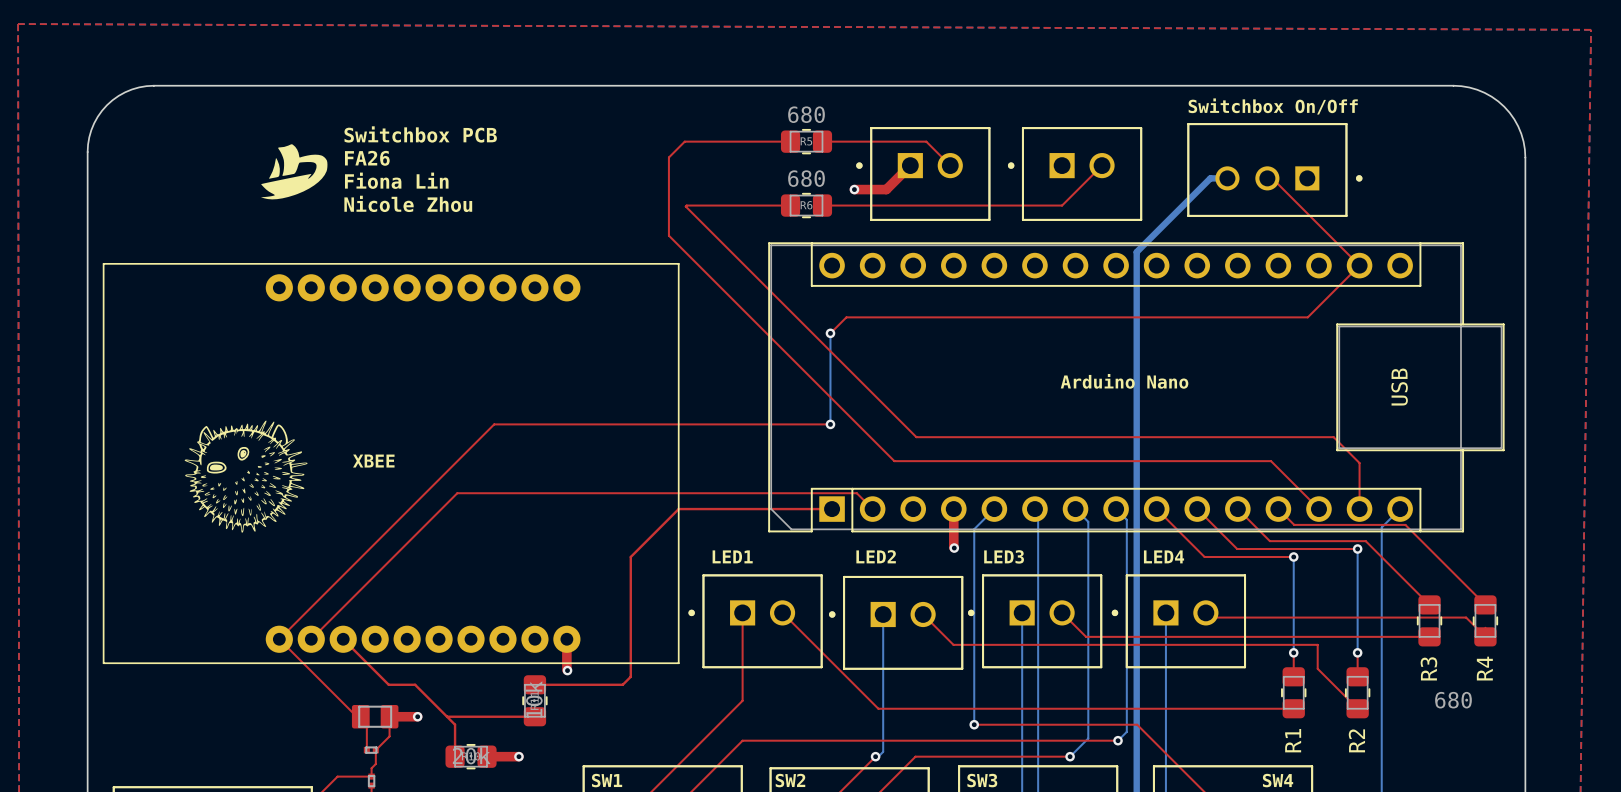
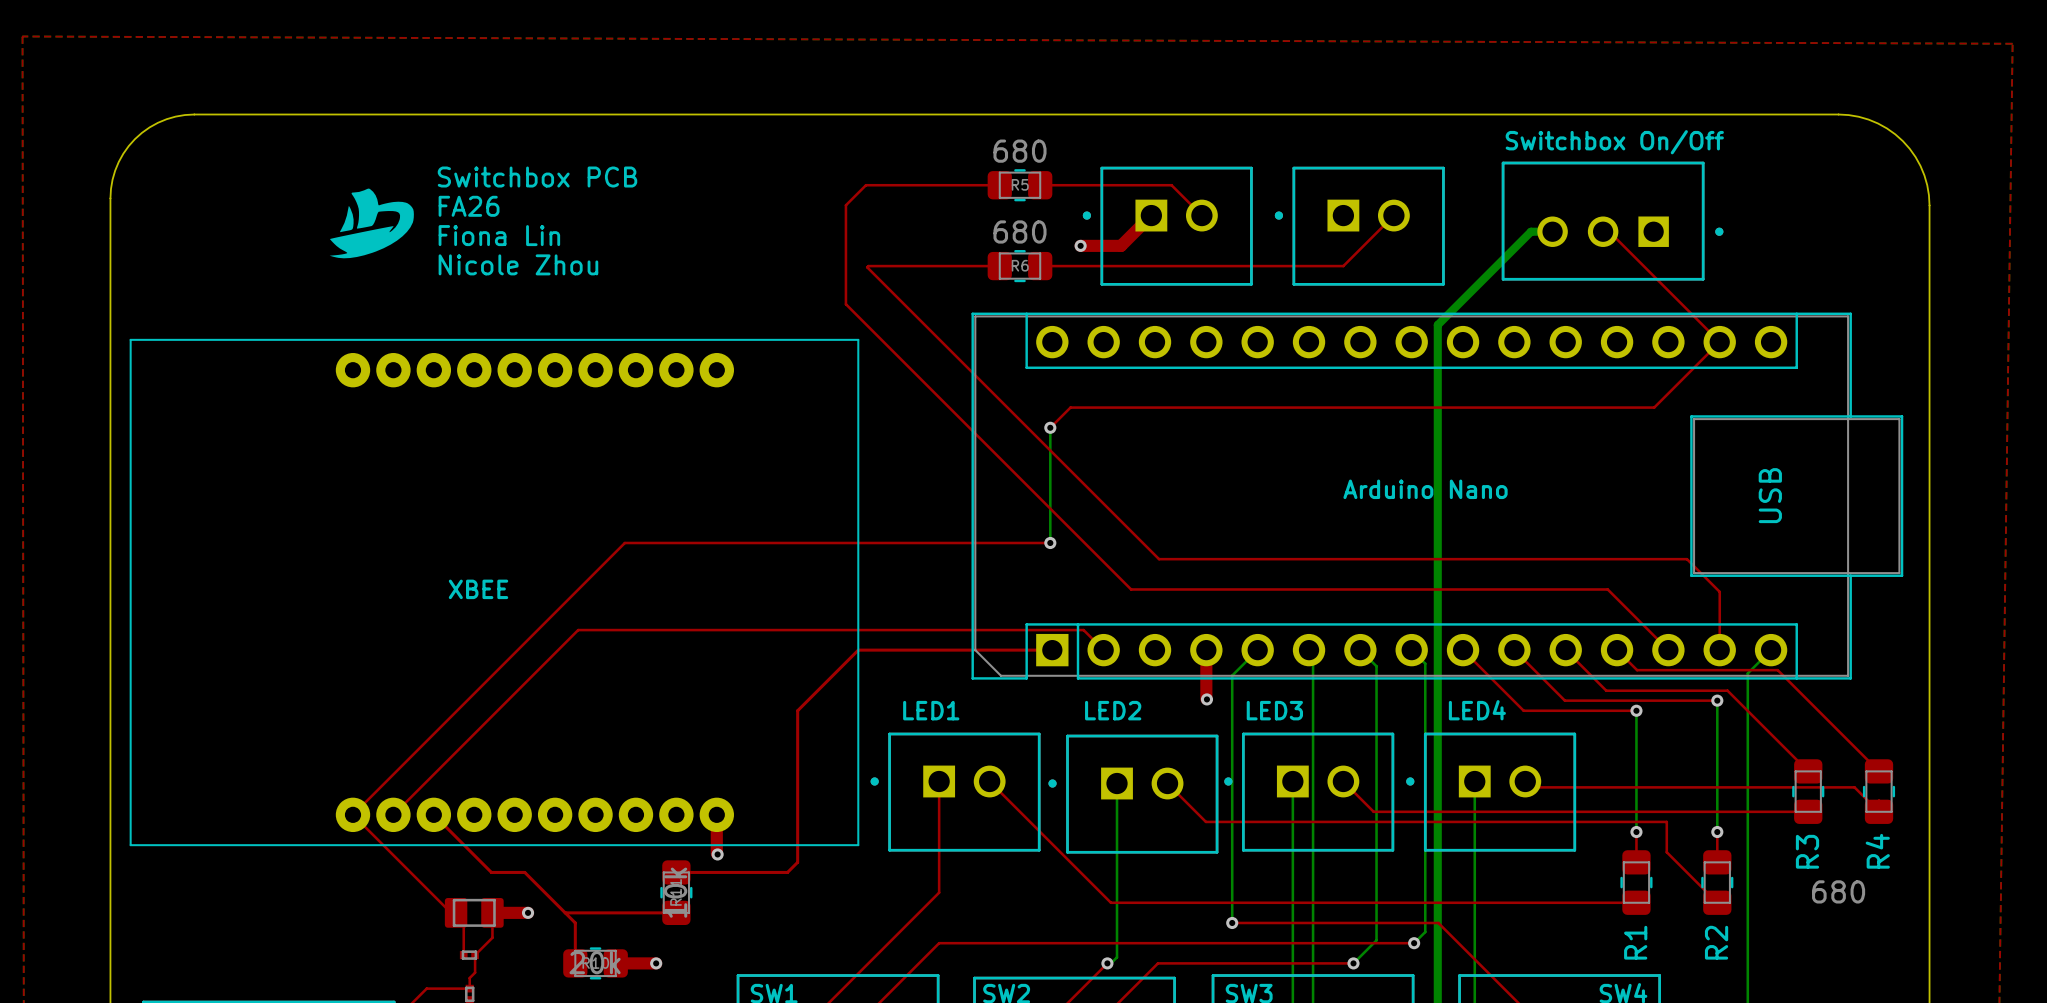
drawing: [184, 420, 308, 533] -> none

